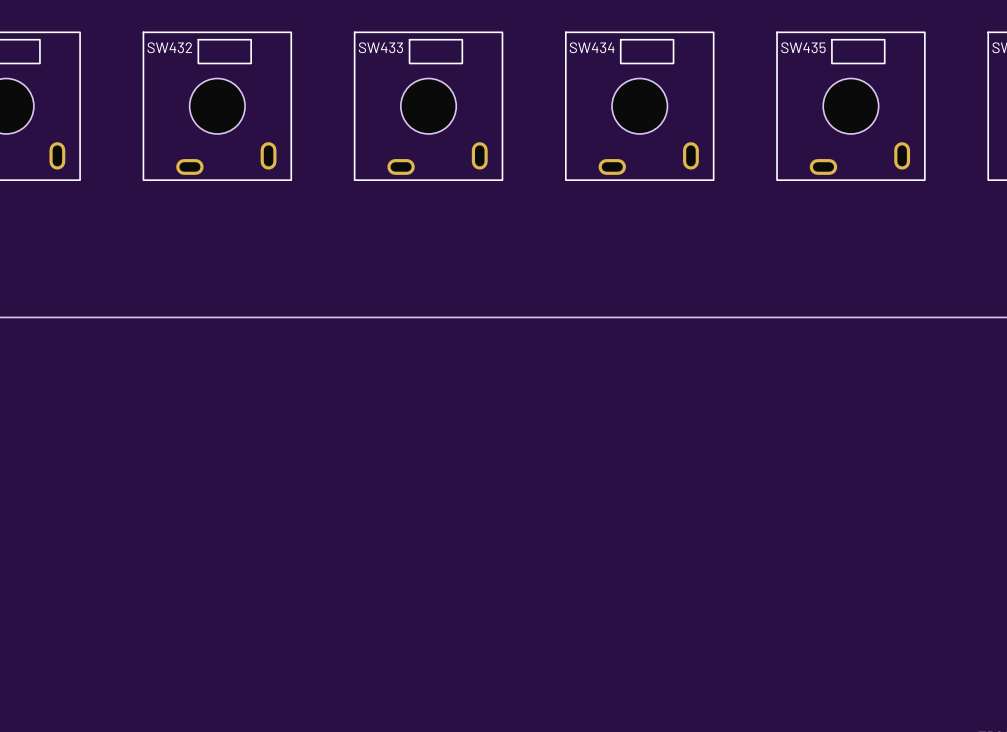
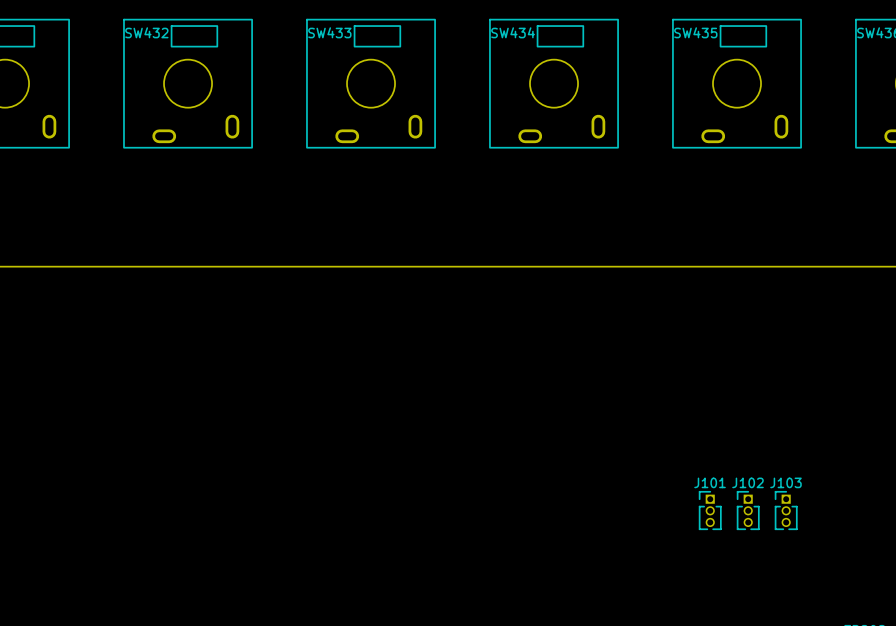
J101: none -> (710, 510)
J102: none -> (748, 510)
J103: none -> (786, 510)

